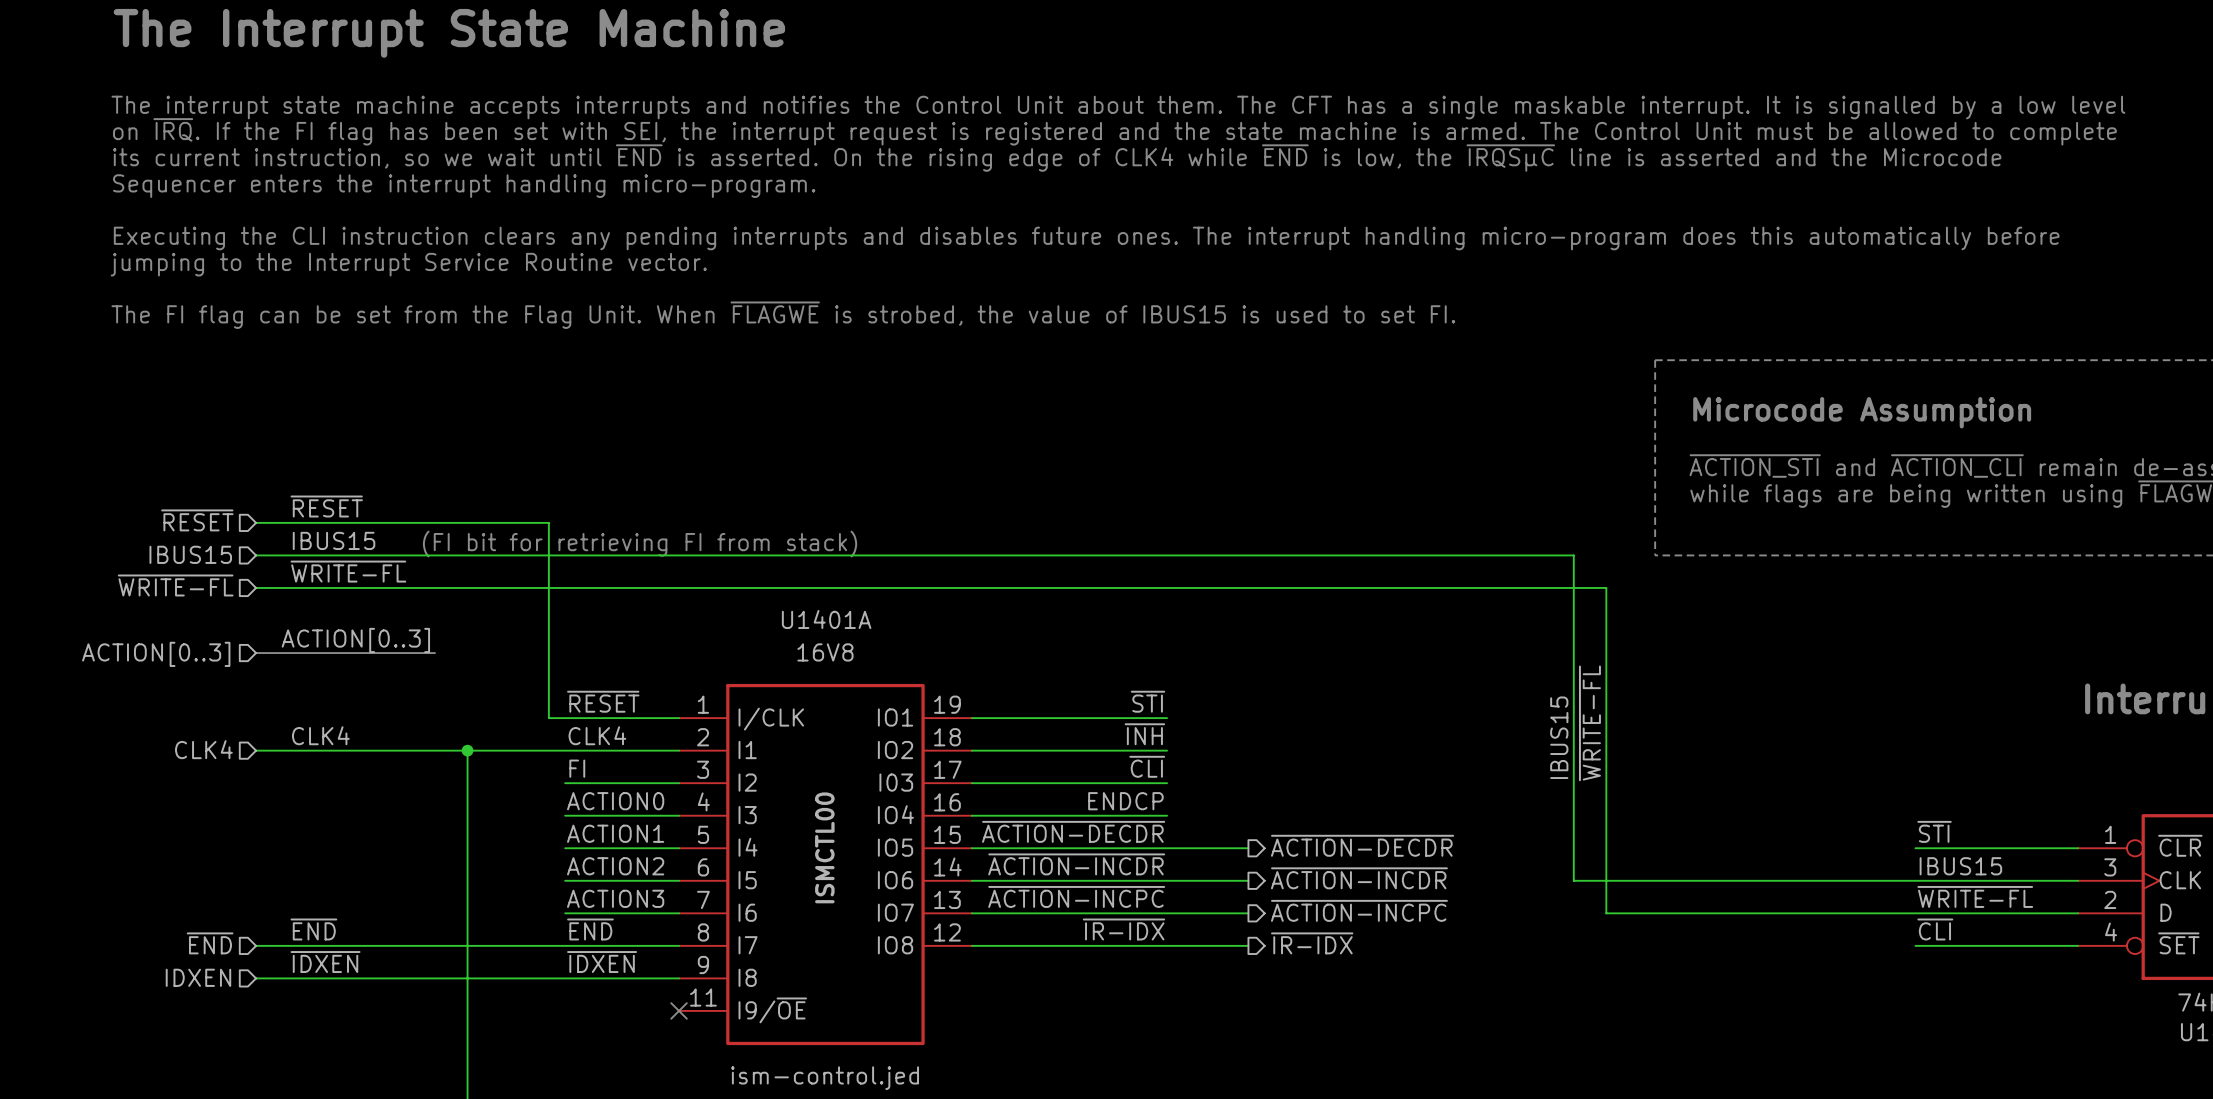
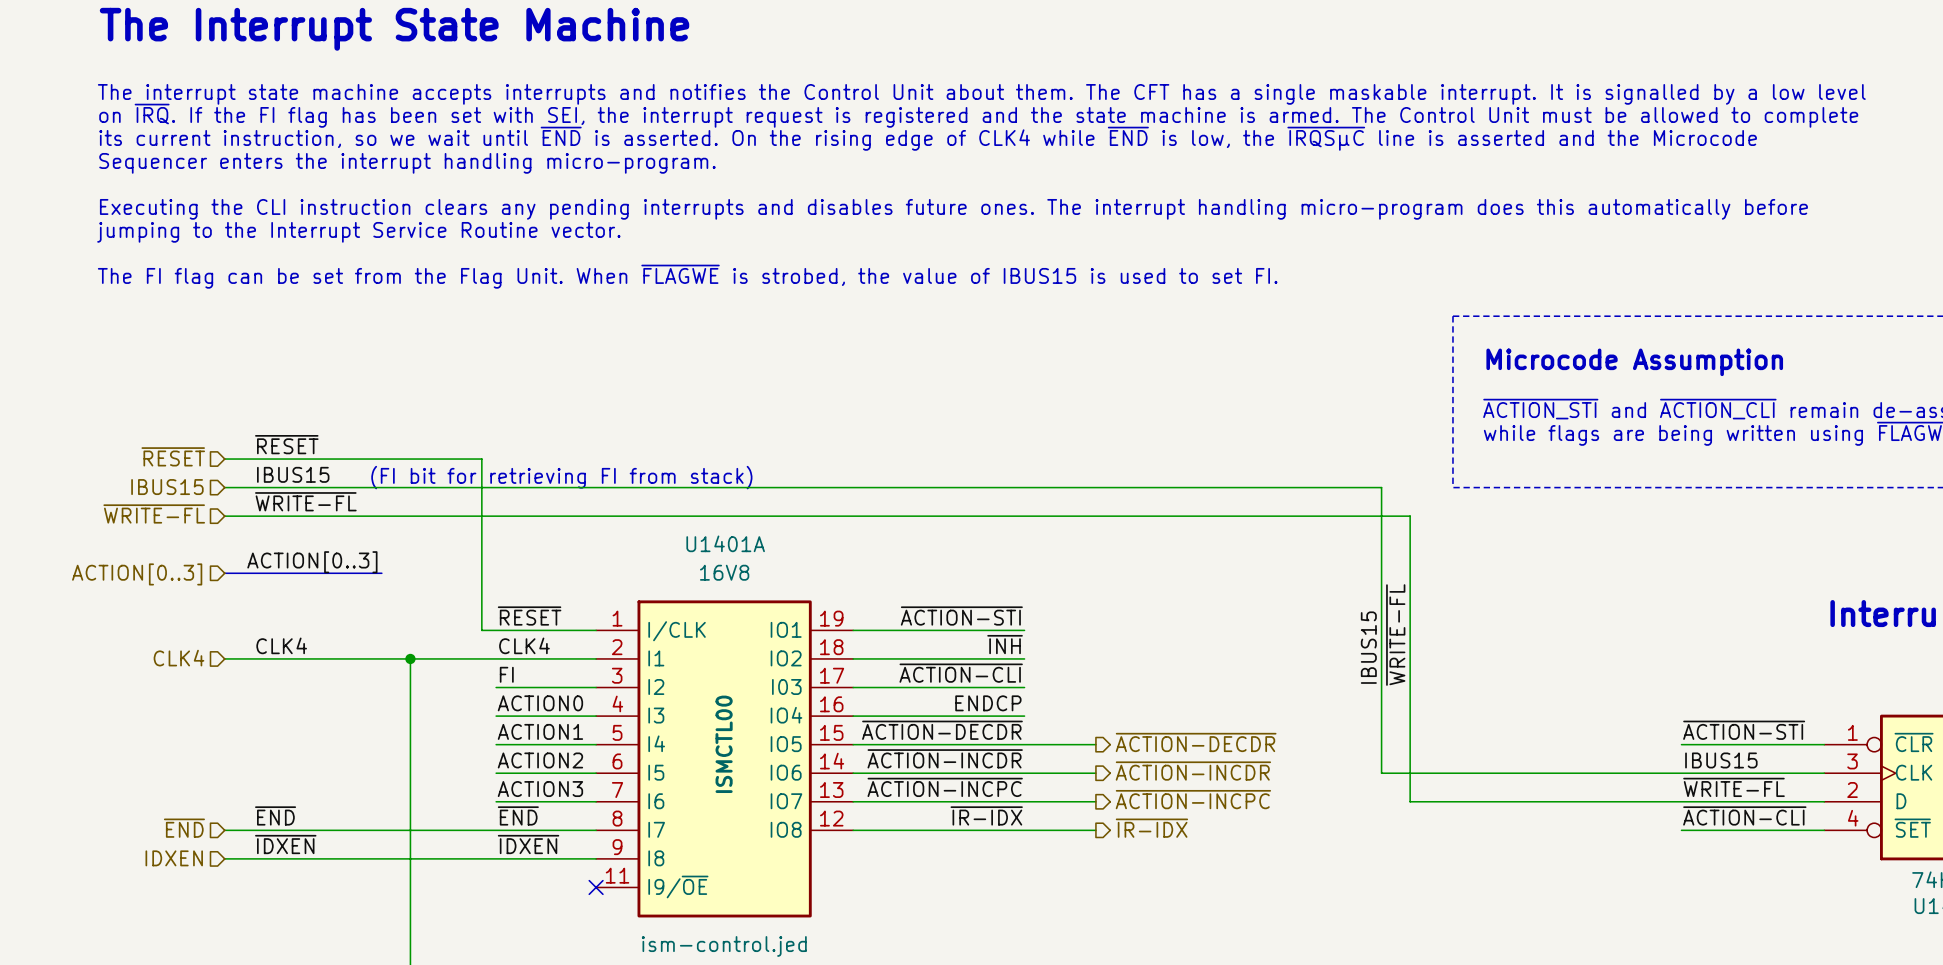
label: ~{STI} (1147, 701) -> ~{ACTION-STI} (961, 616)
label: ~{CLI} (1147, 766) -> ~{ACTION-CLI} (961, 673)
label: ~{STI} (1934, 831) -> ~{ACTION-STI} (1744, 730)
label: ~{CLI} (1935, 929) -> ~{ACTION-CLI} (1744, 815)

